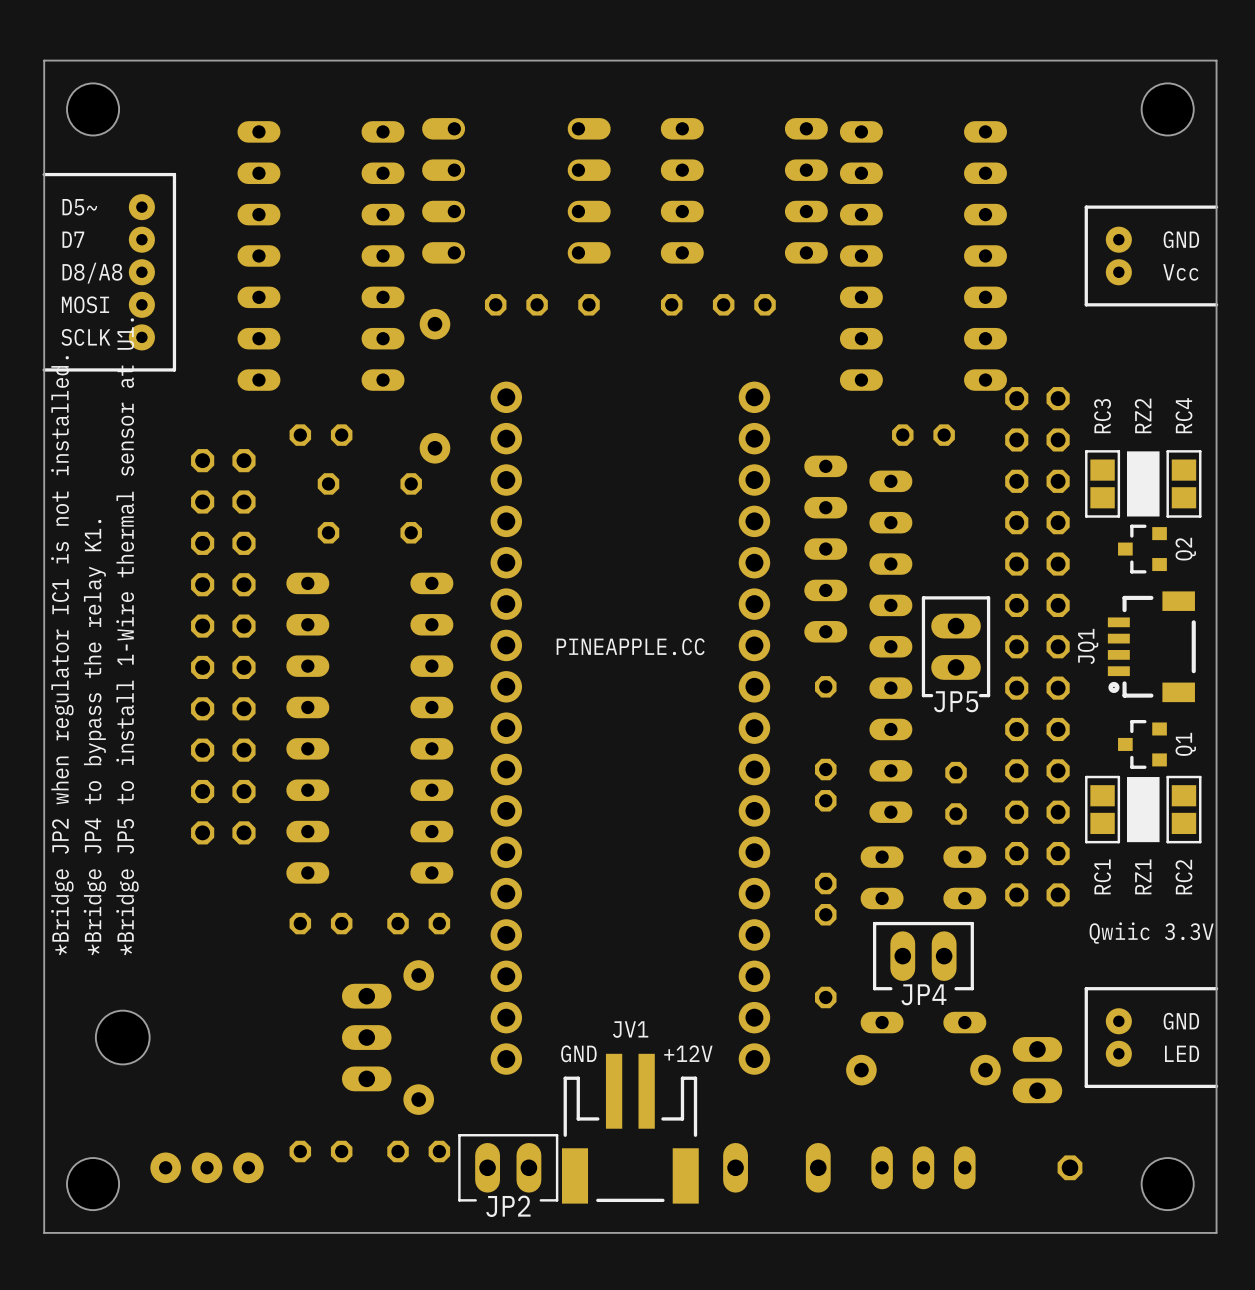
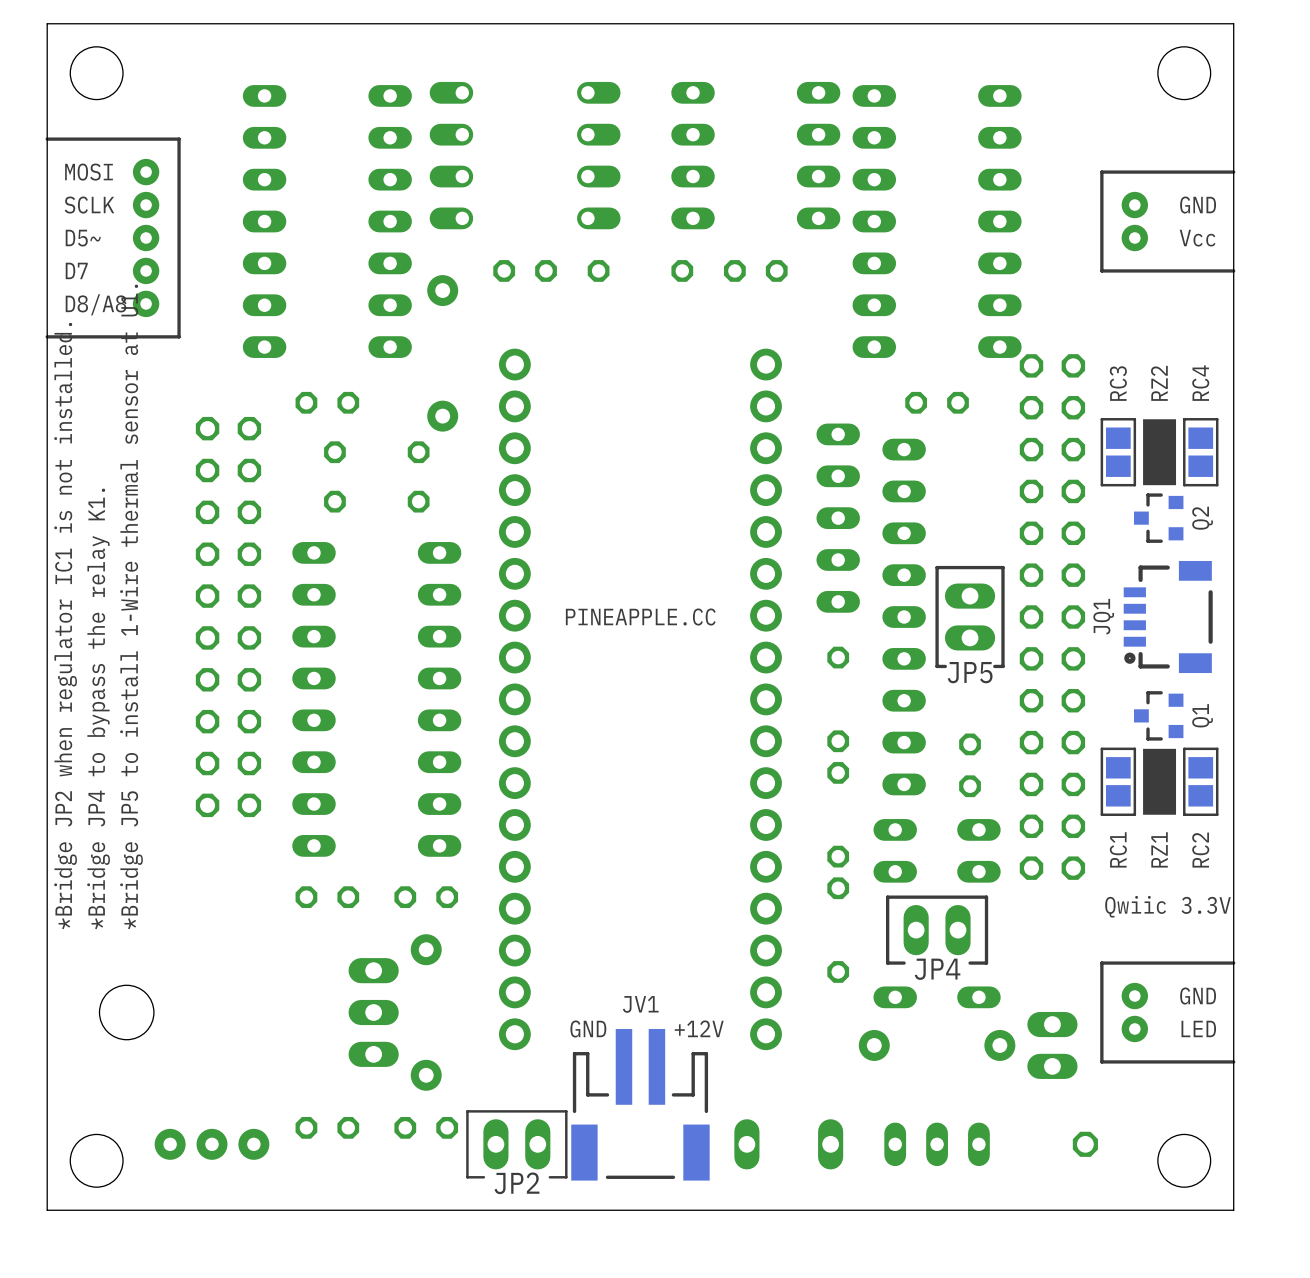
text: D5~ (79, 207) -> MOSI (89, 172)
text: D7 (73, 239) -> SCLK (89, 205)
text: D8/A8 (92, 273) -> D5~ (83, 238)
text: MOSI (85, 304) -> D7 (76, 270)
text: SCLK (85, 337) -> D8/A8 (95, 304)

